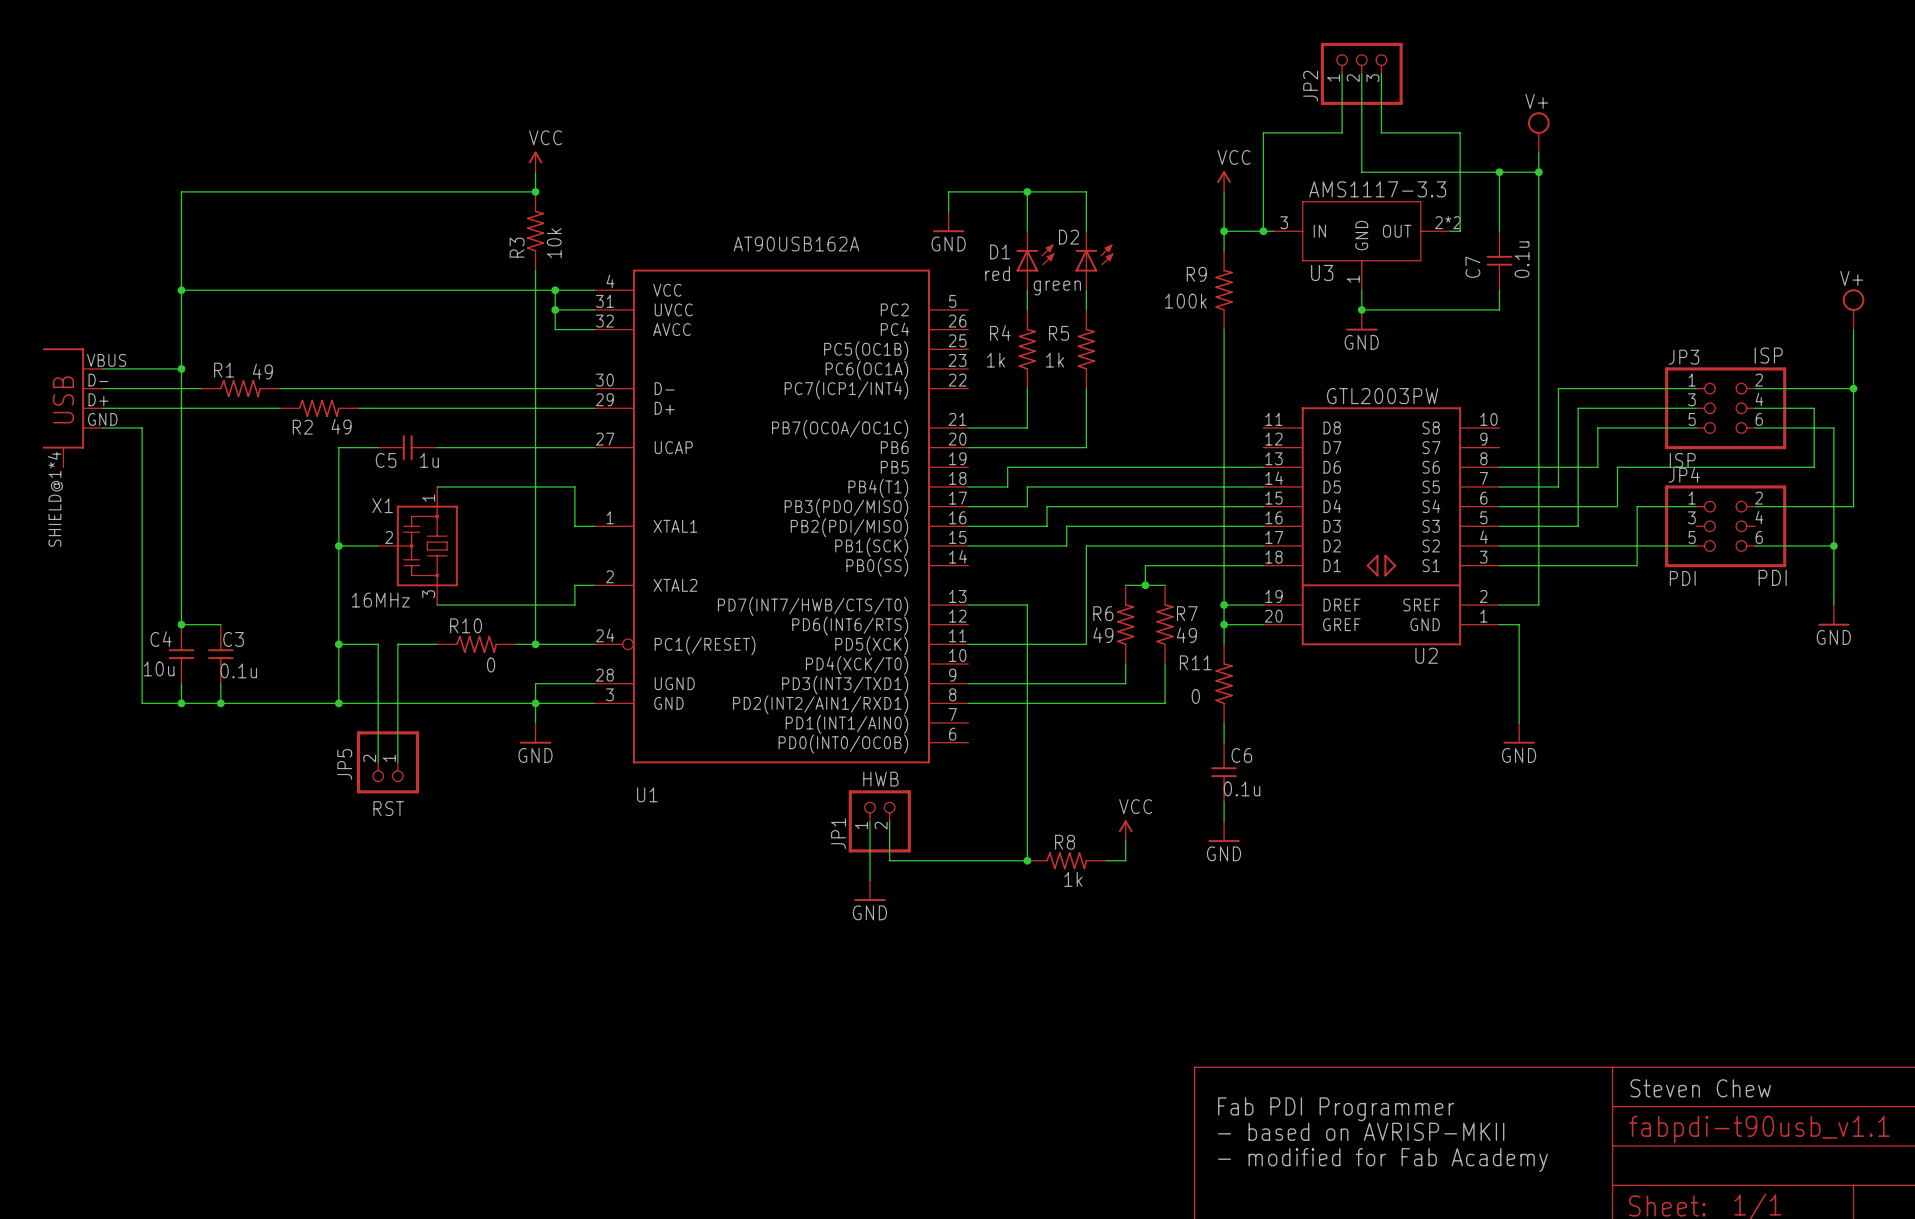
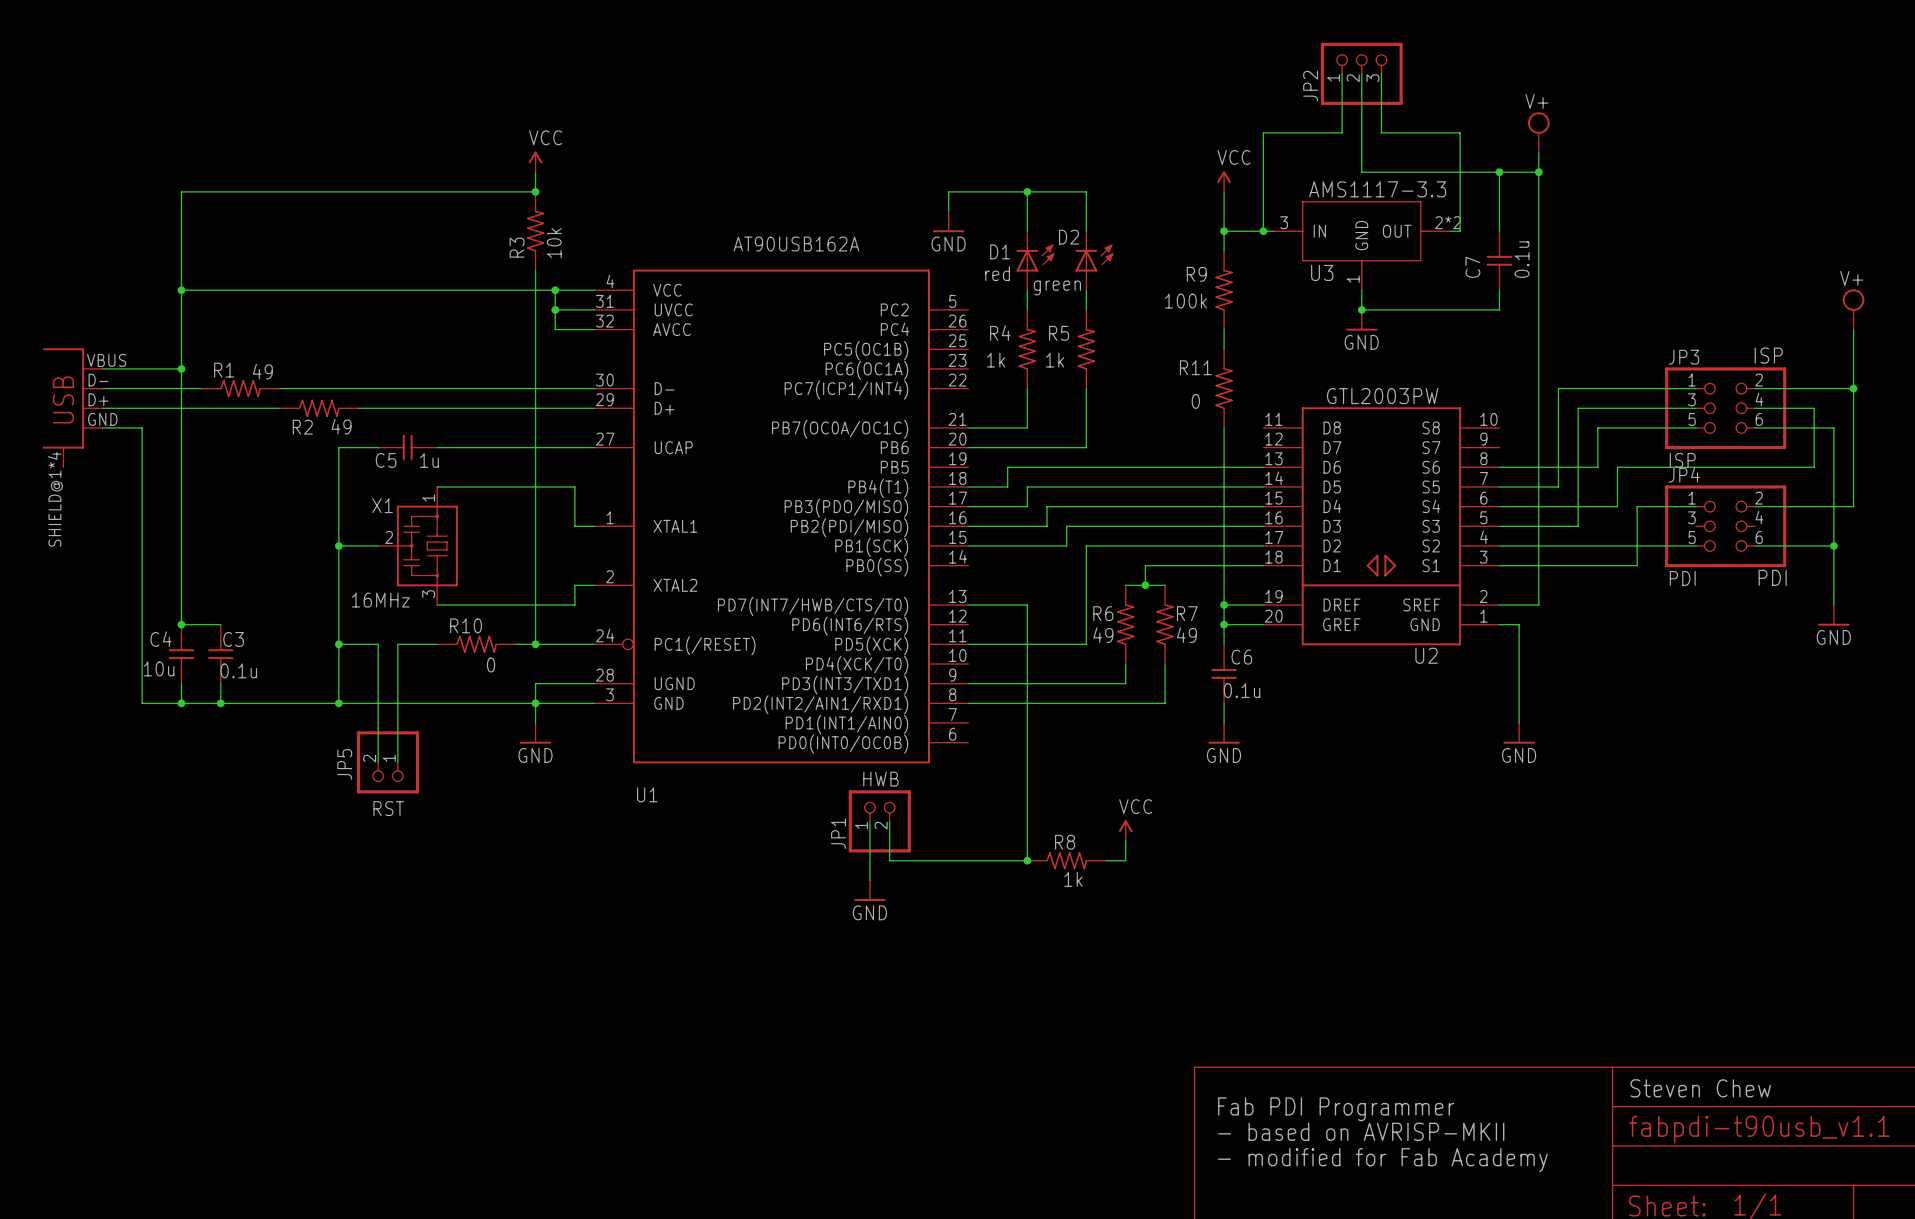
R11 position: (1224, 683) -> (1224, 388)
C6 position: (1224, 772) -> (1224, 673)
wire: (1224, 801) (1224, 821) -> none
power symbol position: GND (1224, 831) -> GND (1224, 733)

